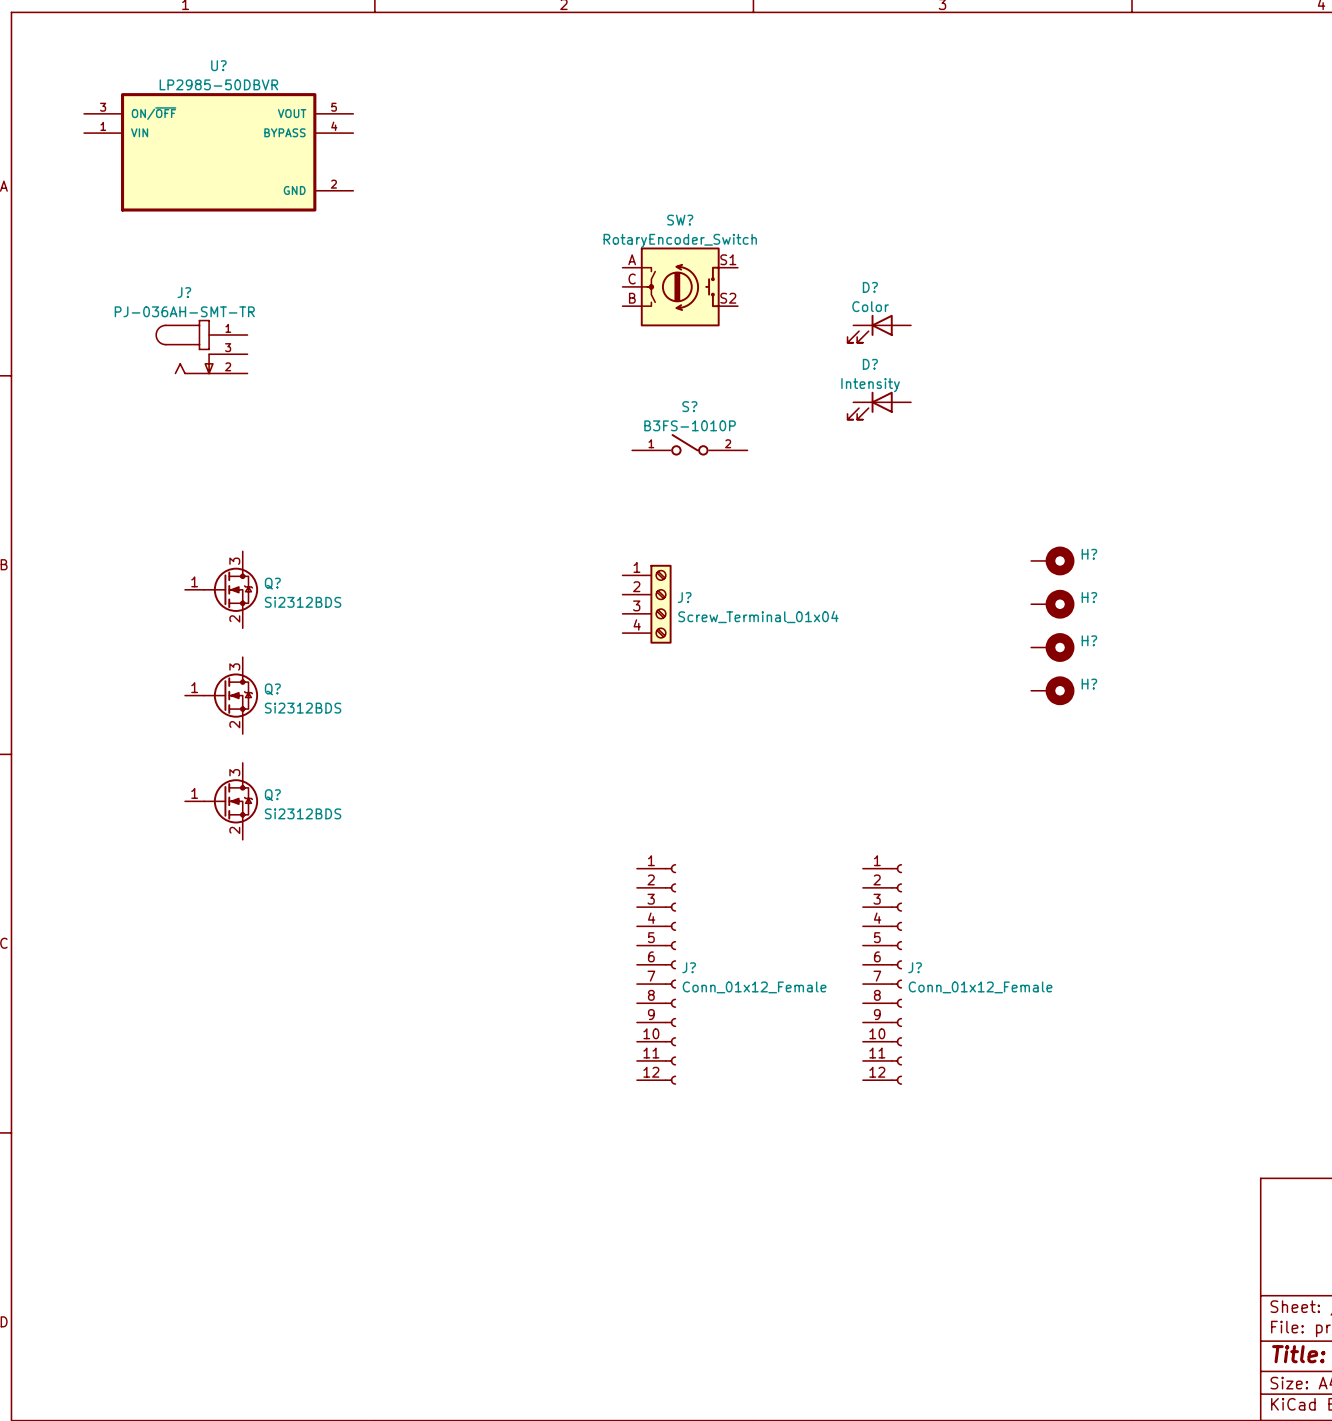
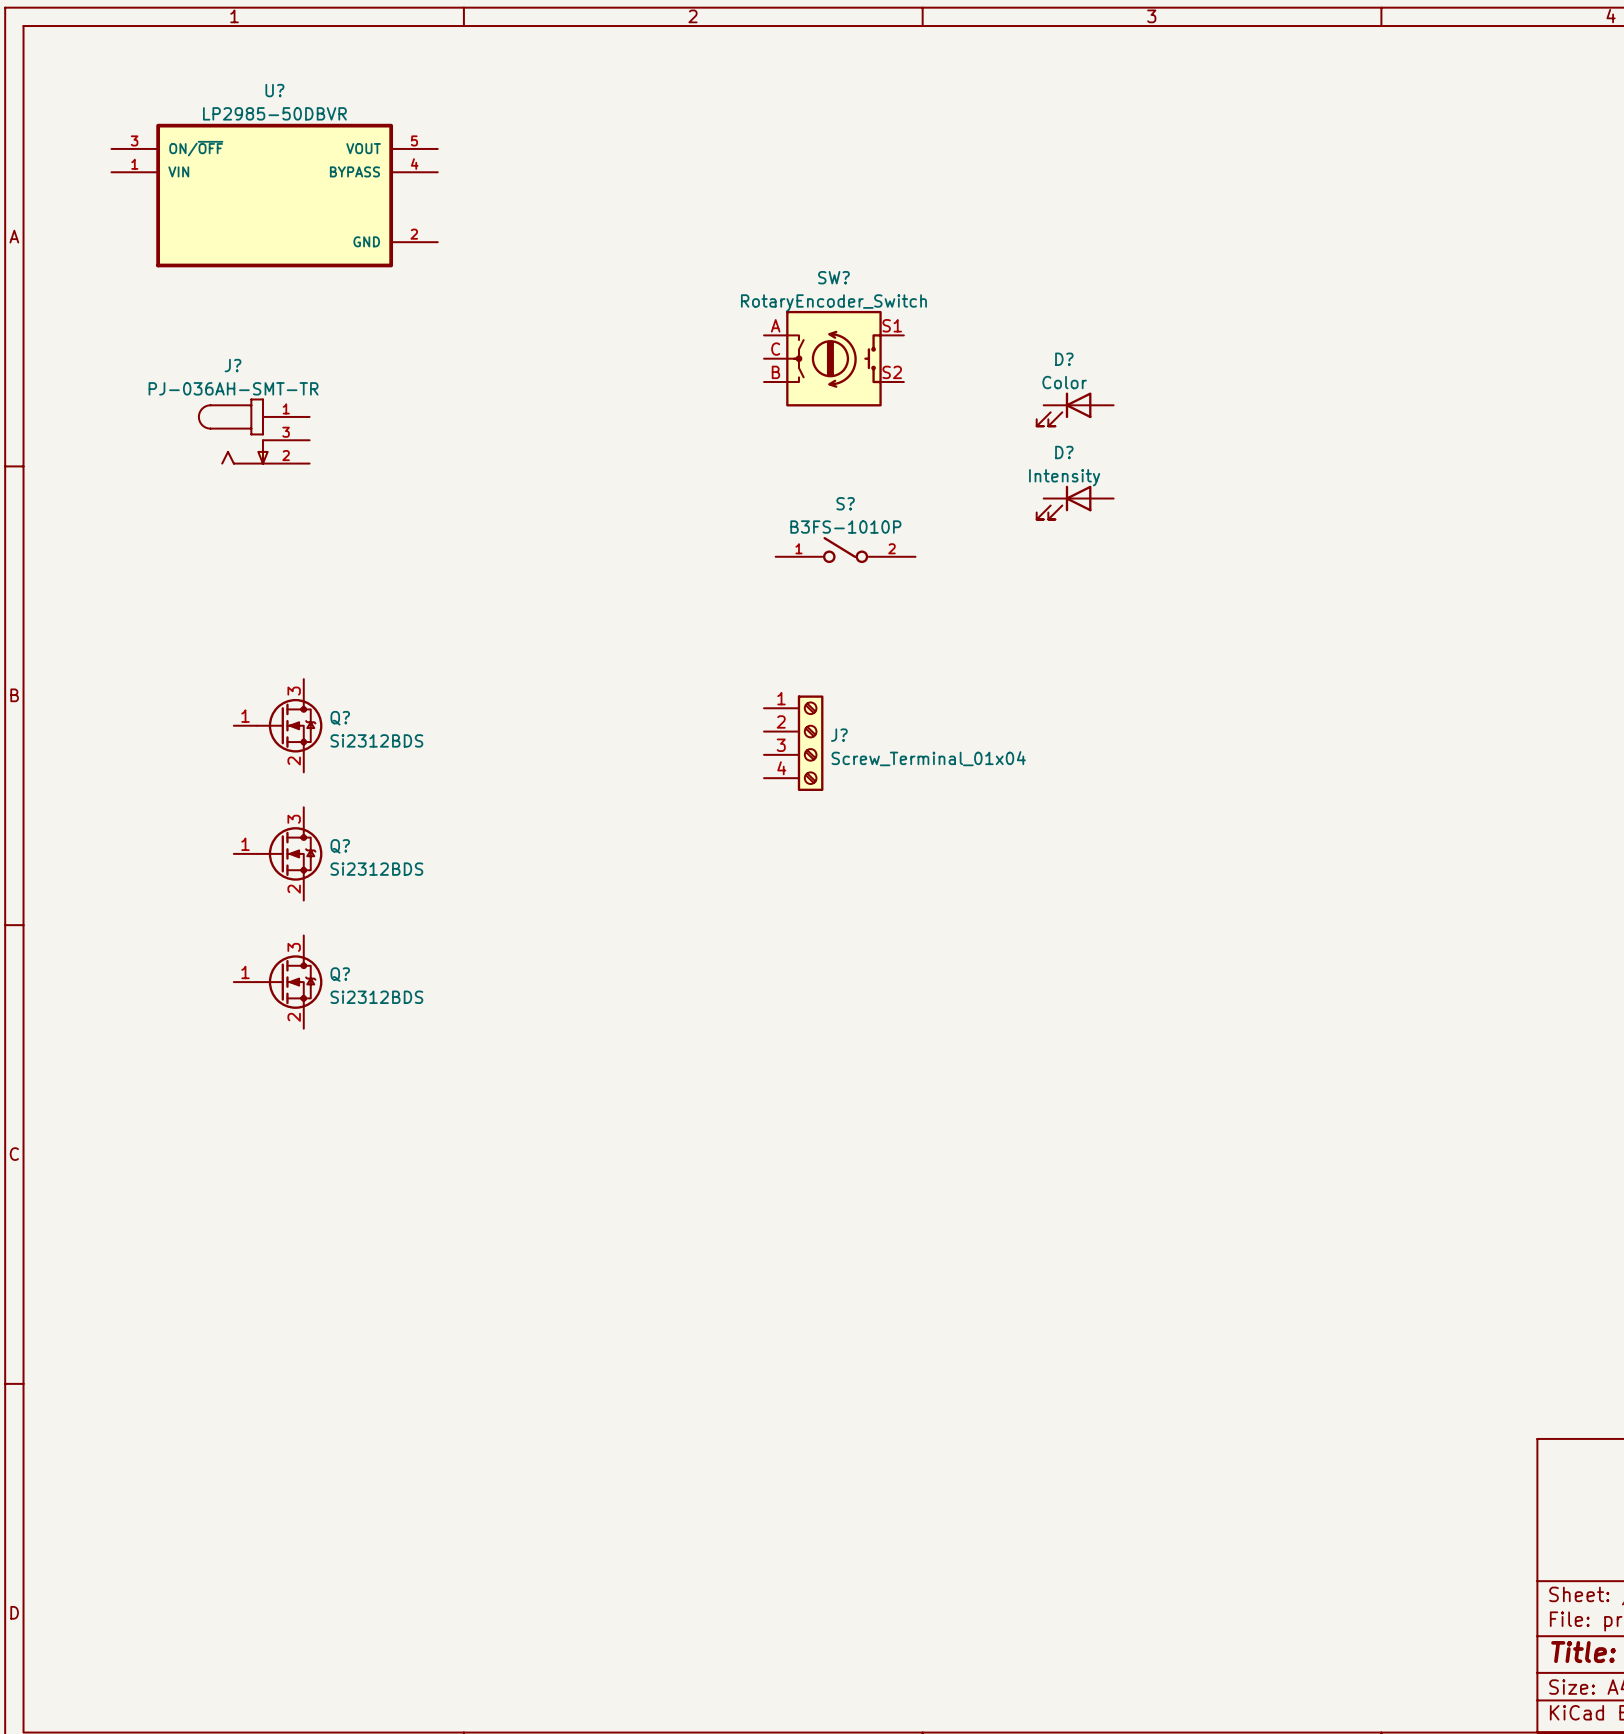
H?: (1052, 560) -> none
H?: (1052, 604) -> none
H?: (1052, 647) -> none
H?: (1052, 690) -> none
J?: Conn_01x12_Female (656, 974) -> none
J?: Conn_01x12_Female (882, 974) -> none

